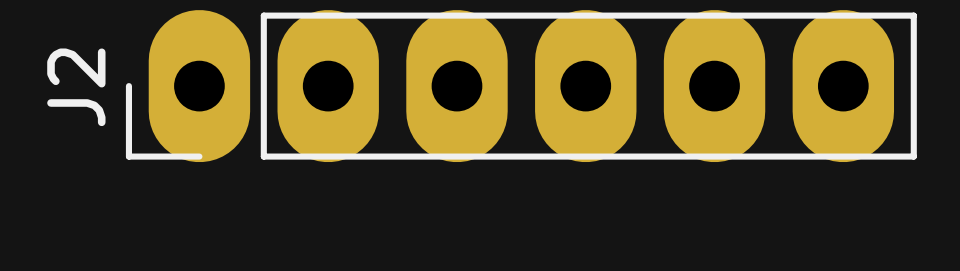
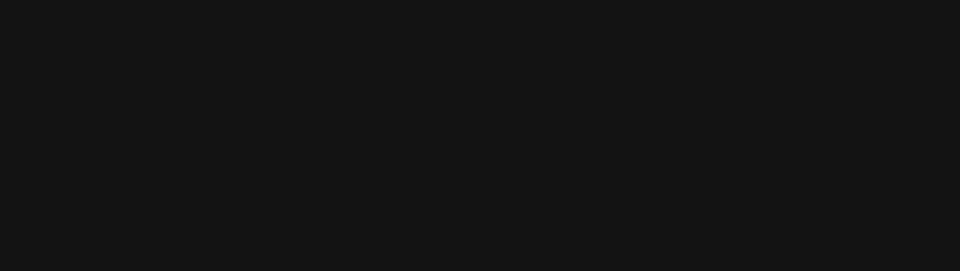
J2: (521, 86) -> none

